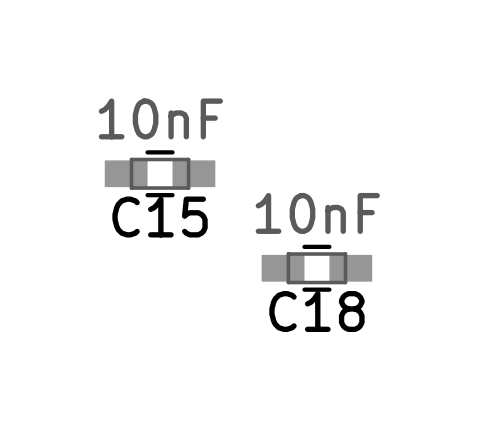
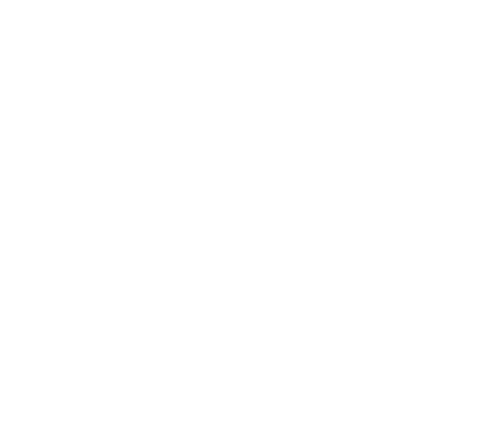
C15: 10nF (160, 173) -> none
C18: 10nF (316, 268) -> none

